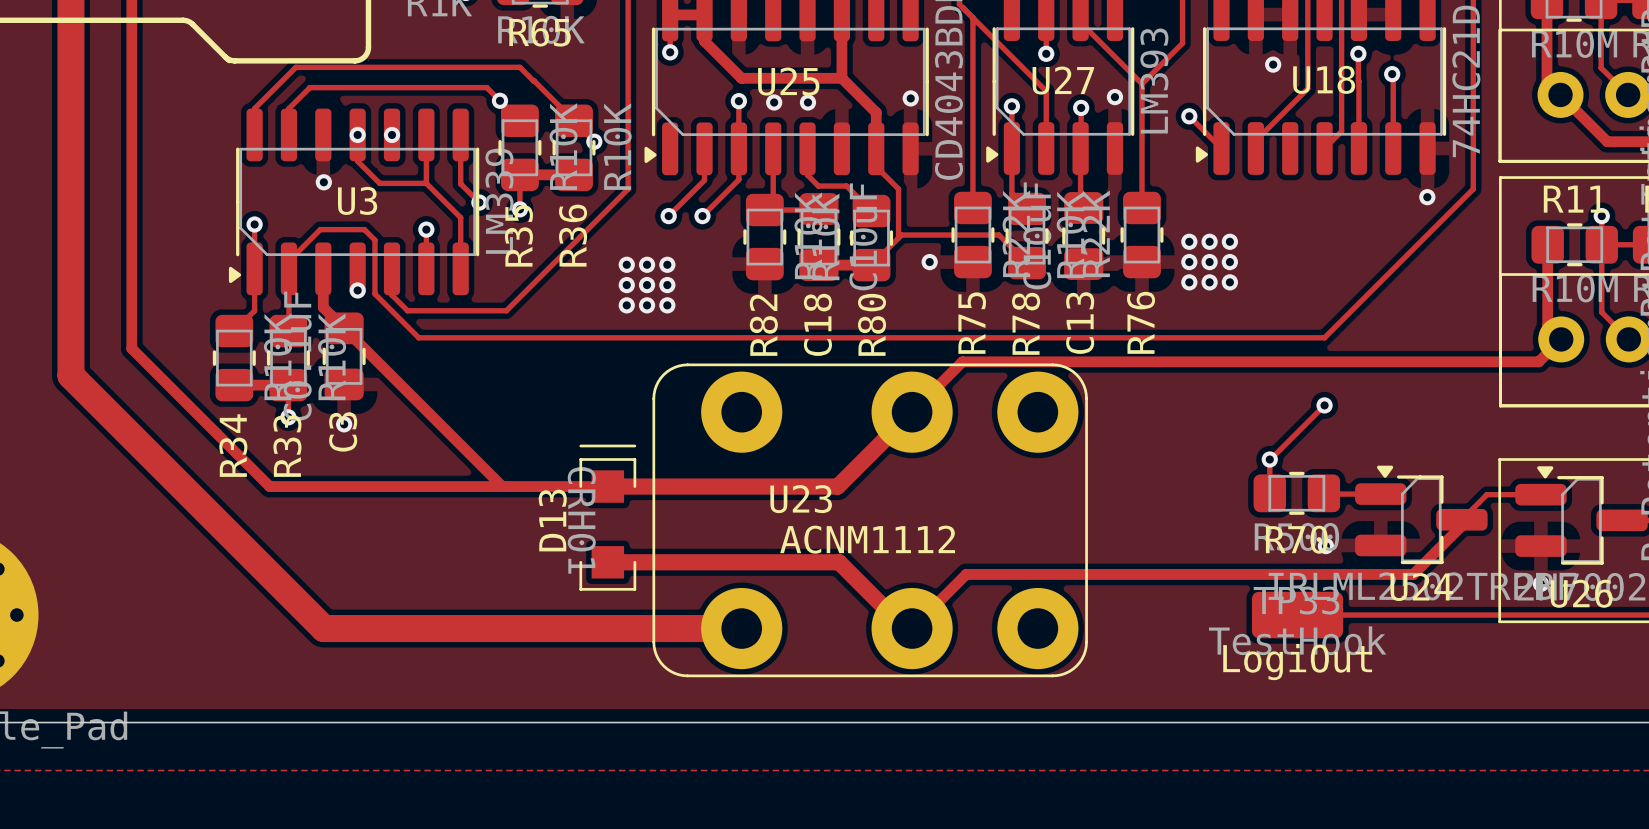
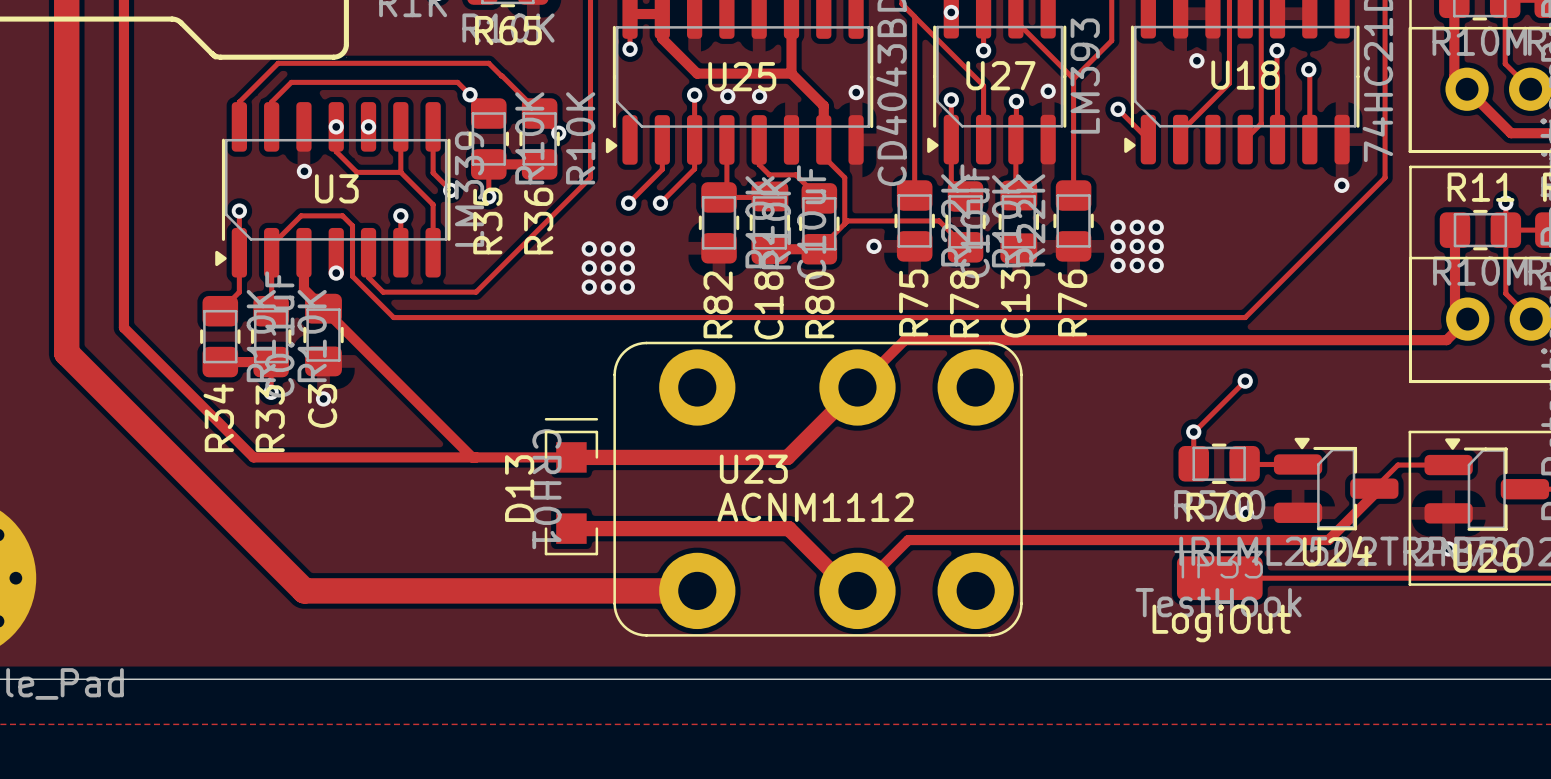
via: none -> (951, 12)

